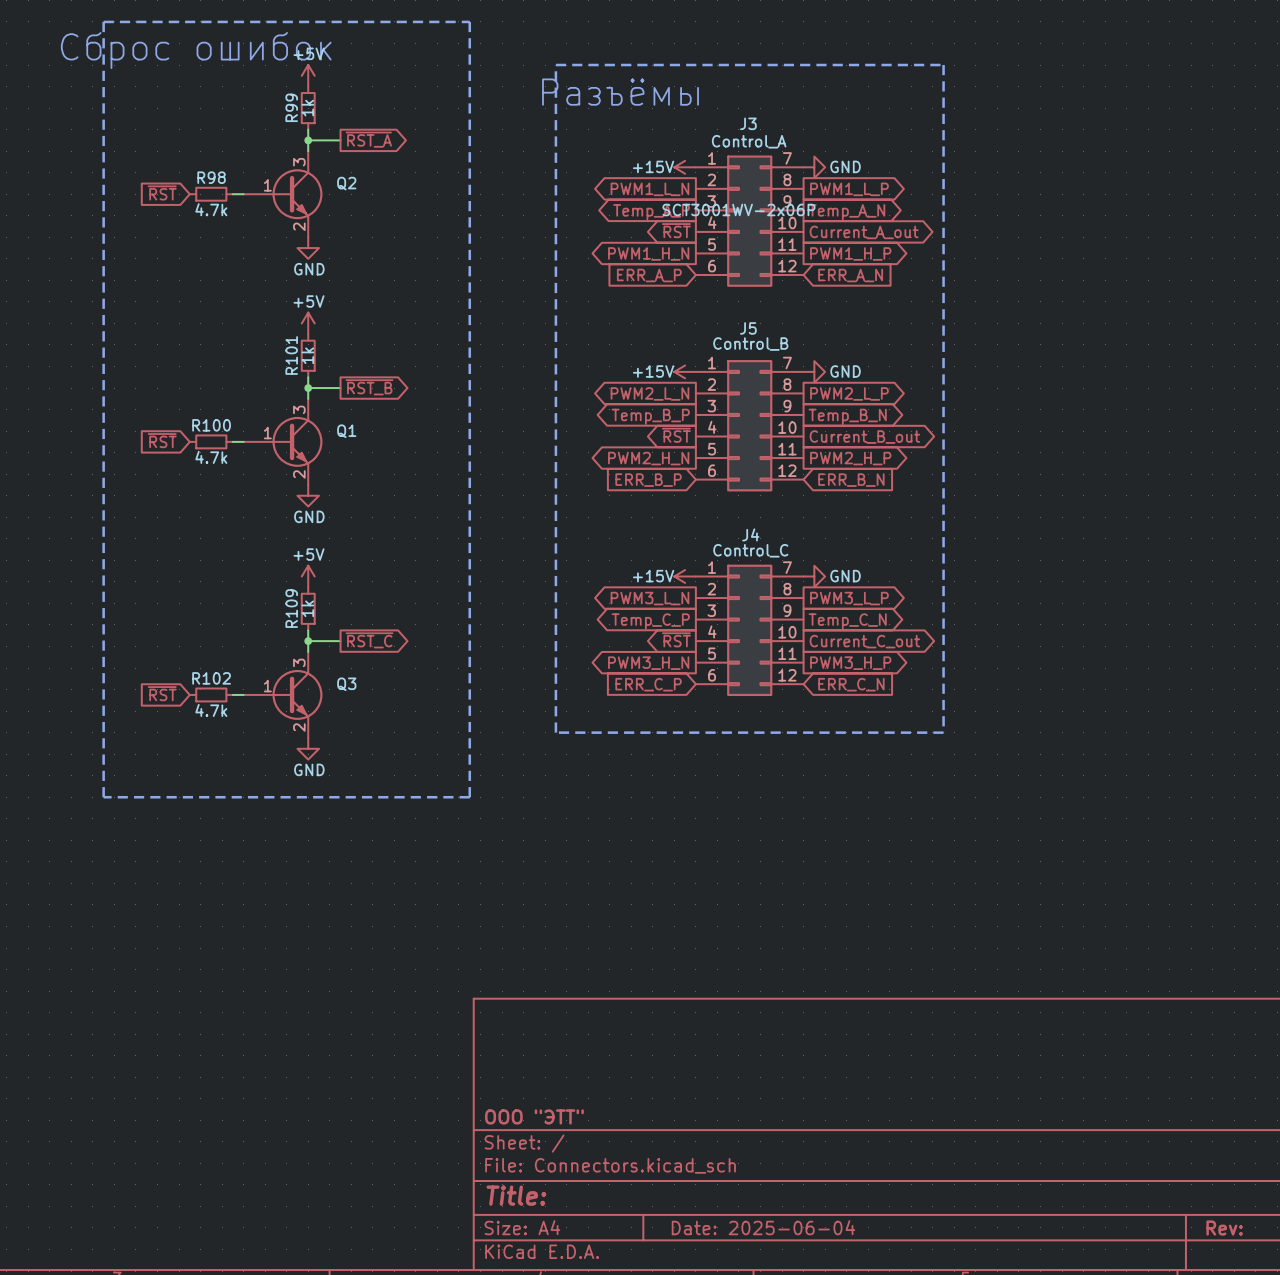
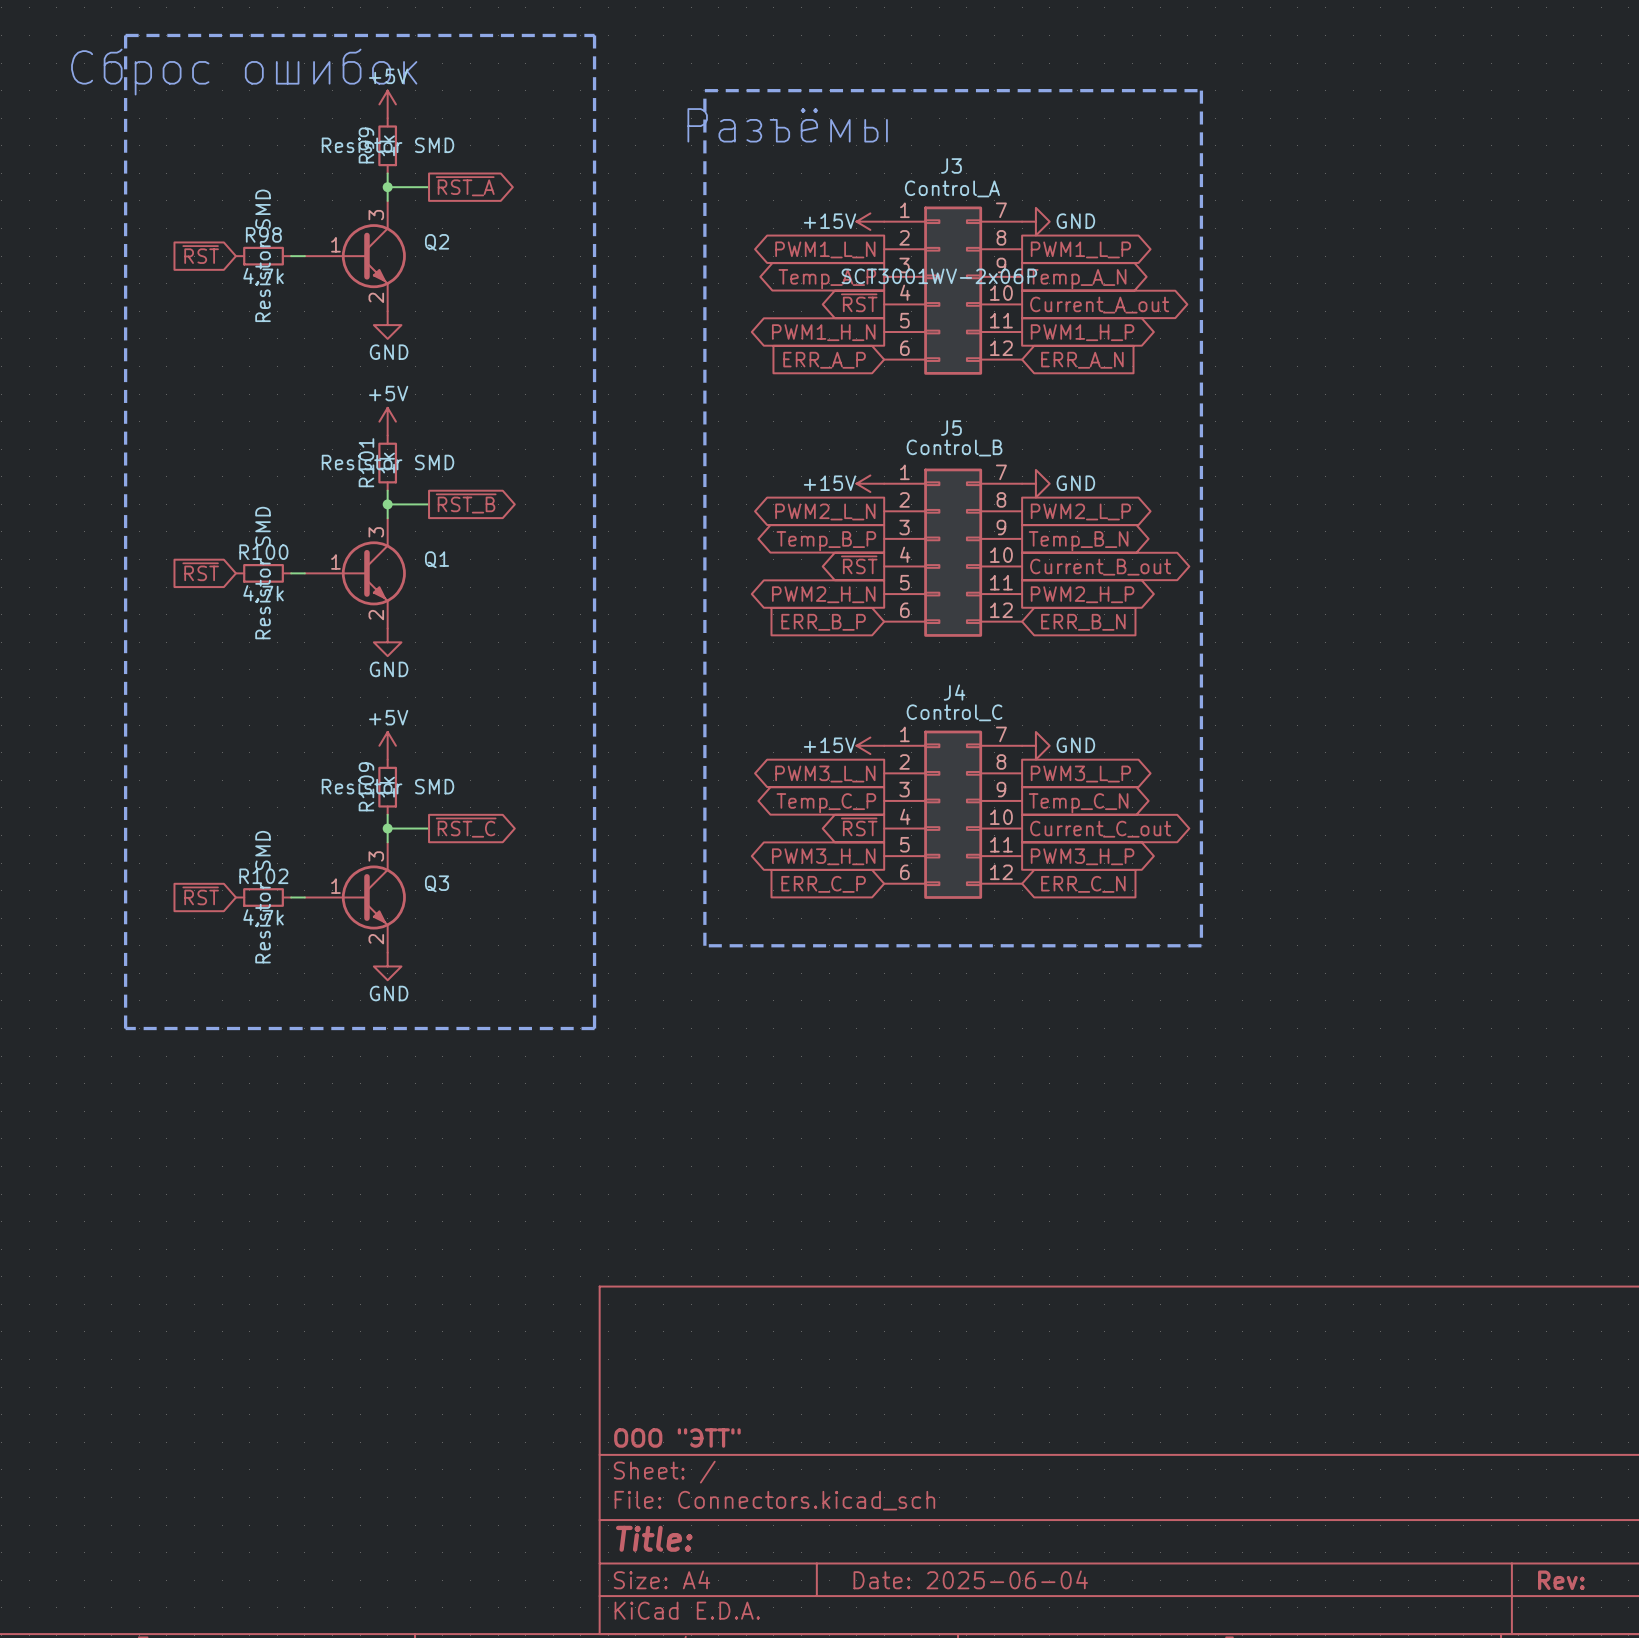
R99 text: none -> Resistor SMD (387, 145)
R98 text: none -> Resistor SMD (263, 255)
R101 text: none -> Resistor SMD (387, 462)
R100 text: none -> Resistor SMD (263, 573)
R109 text: none -> Resistor SMD (387, 786)
R102 text: none -> Resistor SMD (263, 897)

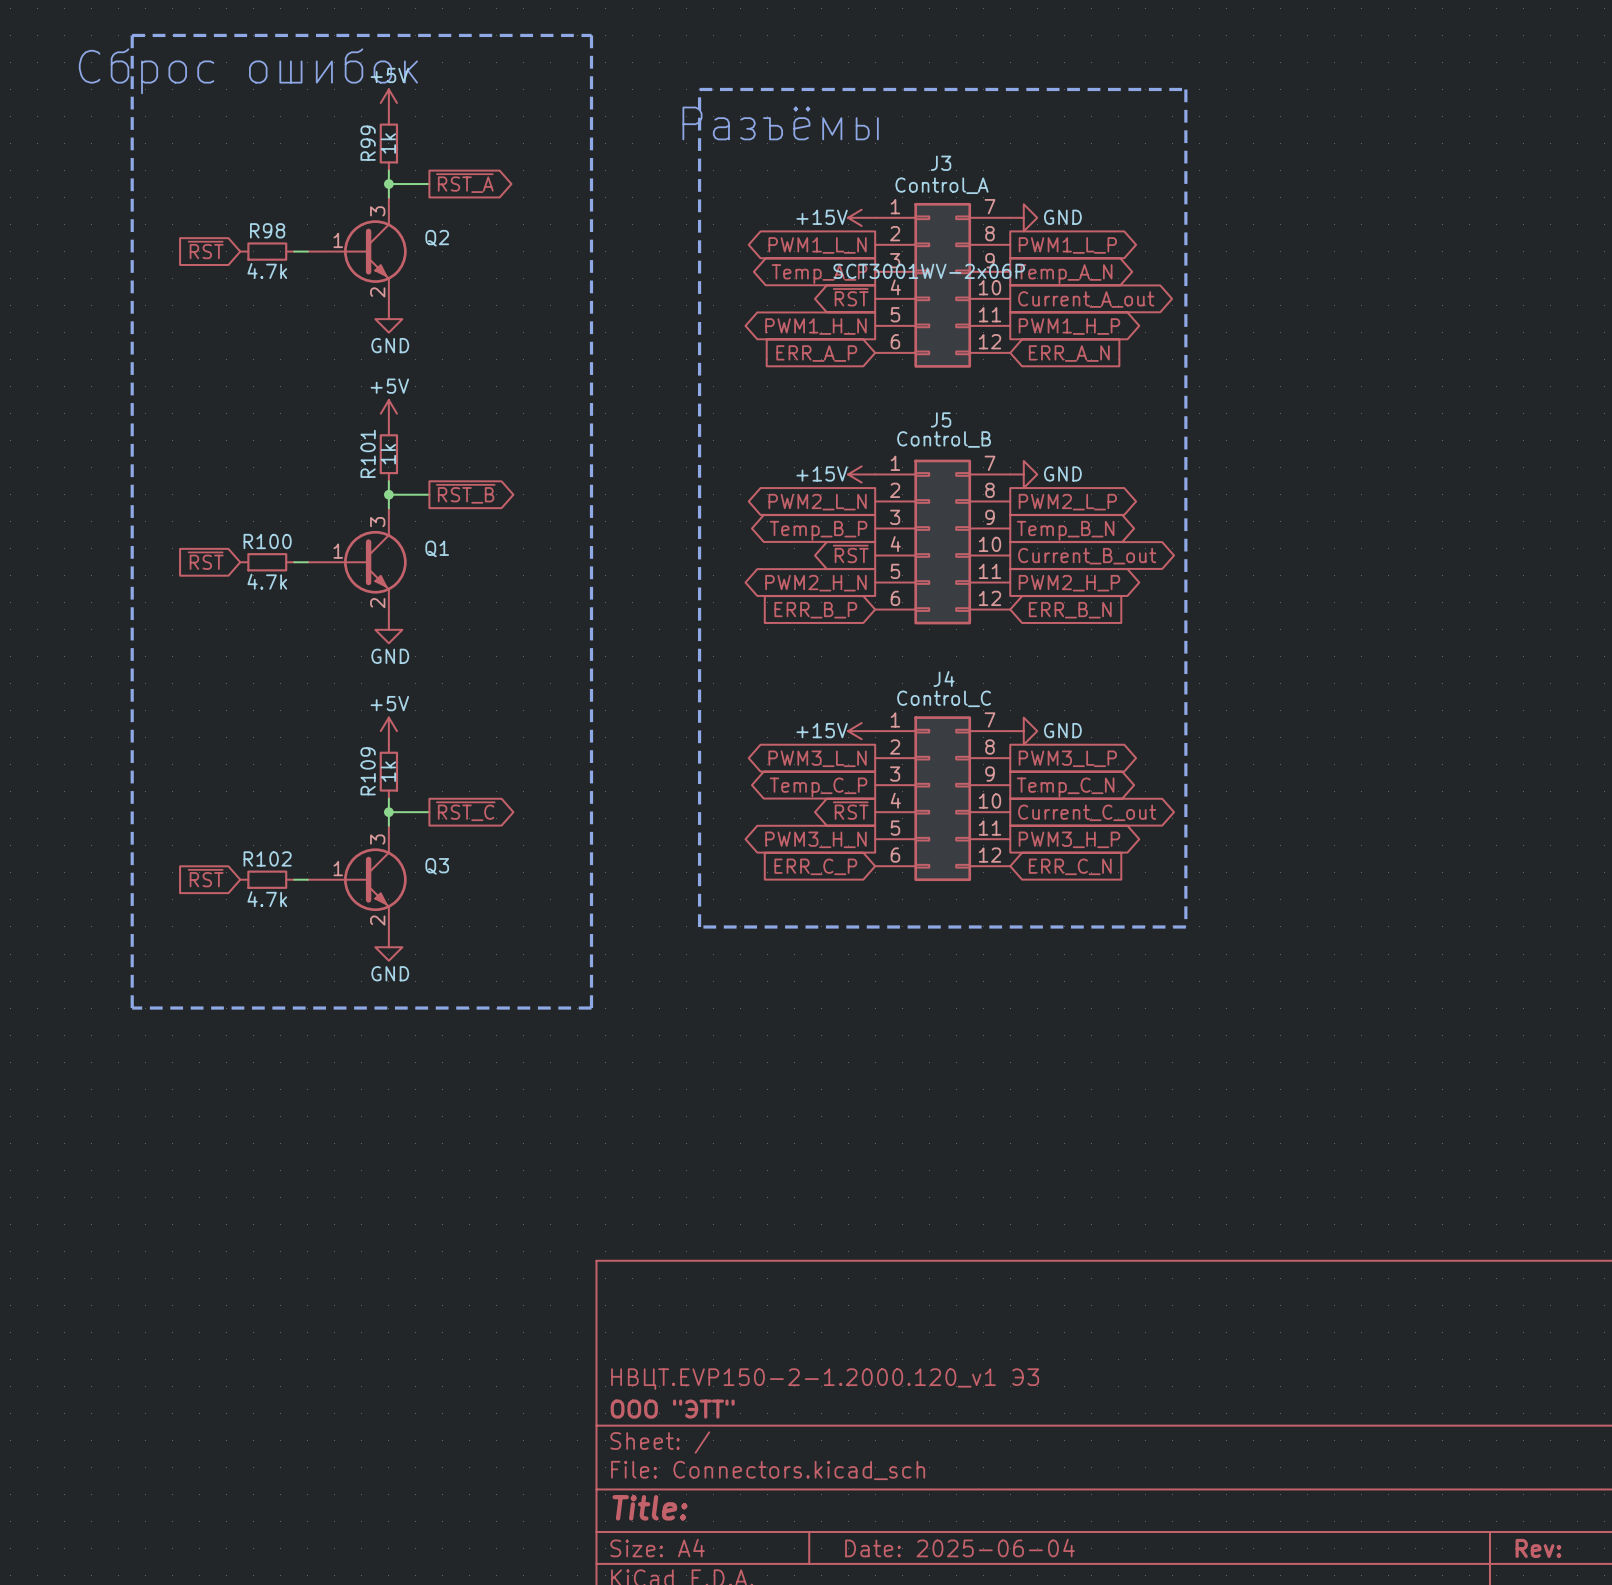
R99 text: Resistor SMD (387, 145) -> none
R98 text: Resistor SMD (263, 255) -> none
R101 text: Resistor SMD (387, 462) -> none
R100 text: Resistor SMD (263, 573) -> none
R109 text: Resistor SMD (387, 786) -> none
R102 text: Resistor SMD (263, 897) -> none
title block: none -> НВЦТ.EVP150-2-1.2000.120_v1 Э3 (825, 1379)

